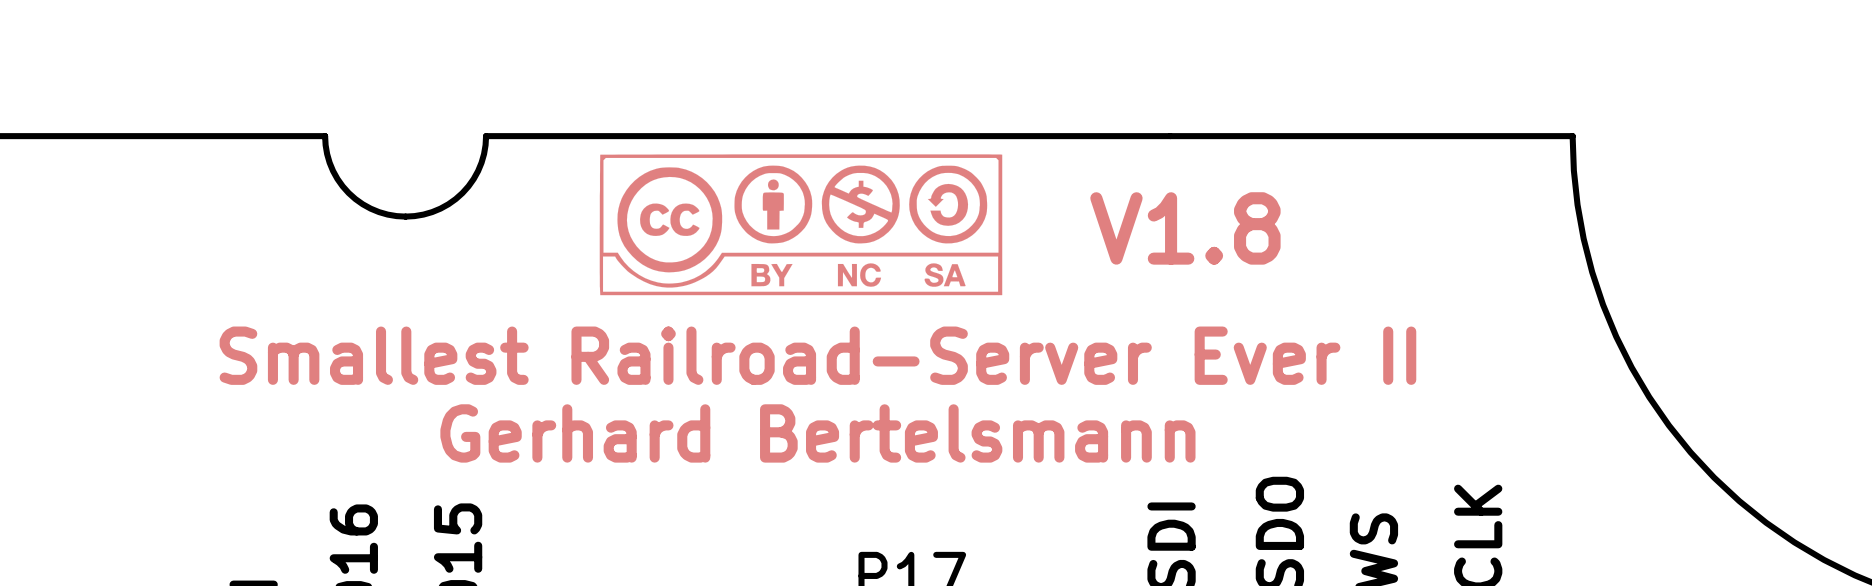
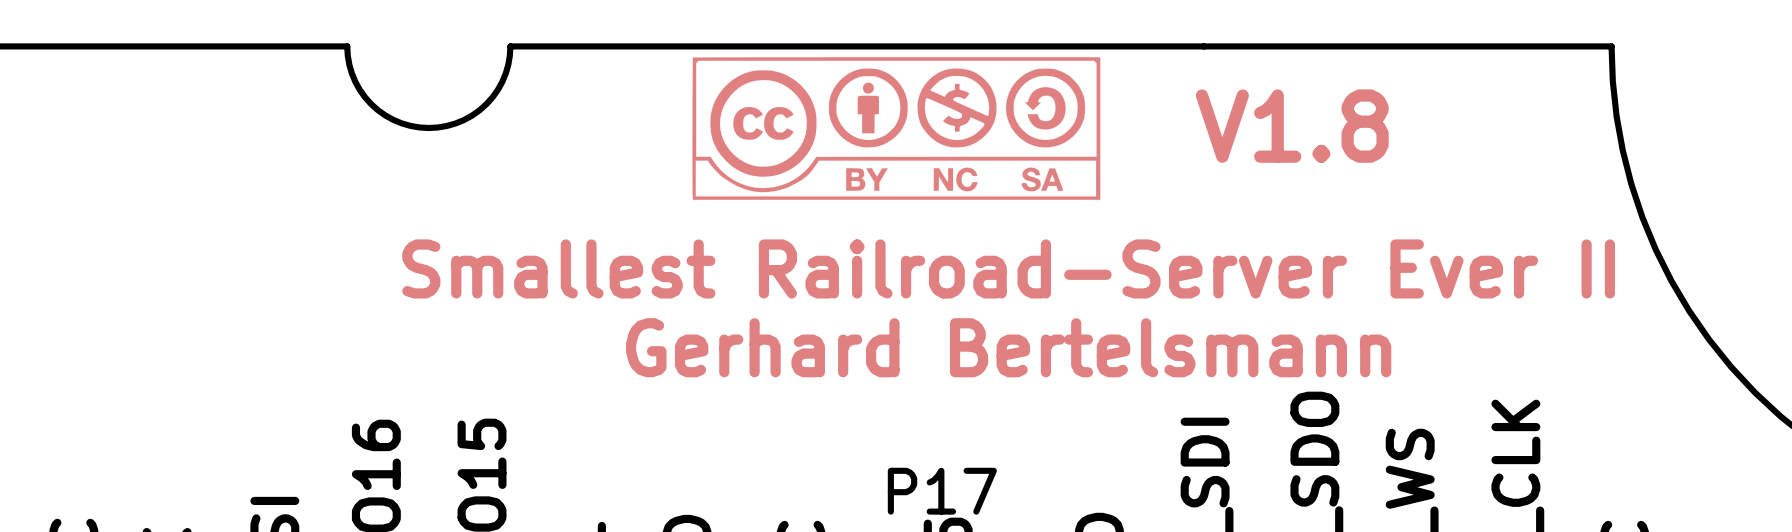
drawing position: (800, 224) -> (896, 128)
text position: V1.8 (1185, 228) -> V1.8 (1292, 126)
text position: Smallest Railroad-Server Ever II (817, 355) -> Smallest Railroad-Server Ever II (1008, 268)
text position: Gerhard Bertelsmann (817, 433) -> Gerhard Bertelsmann (1008, 347)

